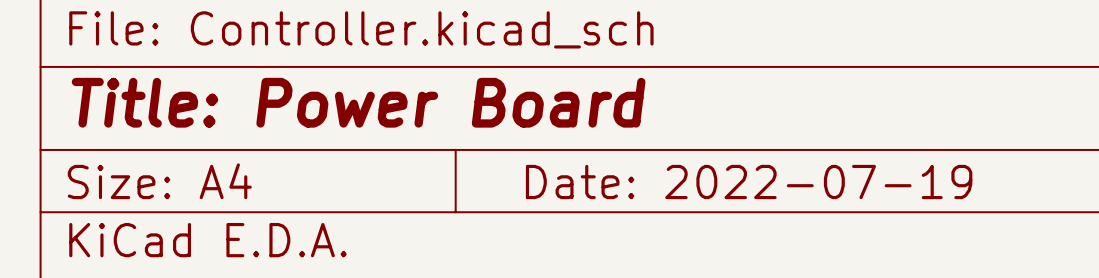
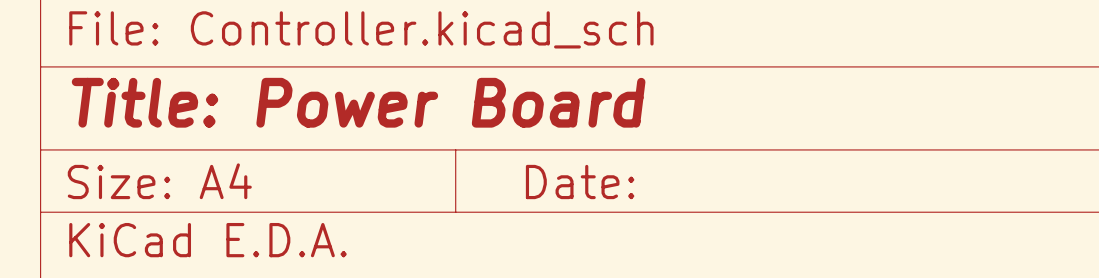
title block: Date: 2022-07-19 (749, 182) -> Date: (580, 182)

